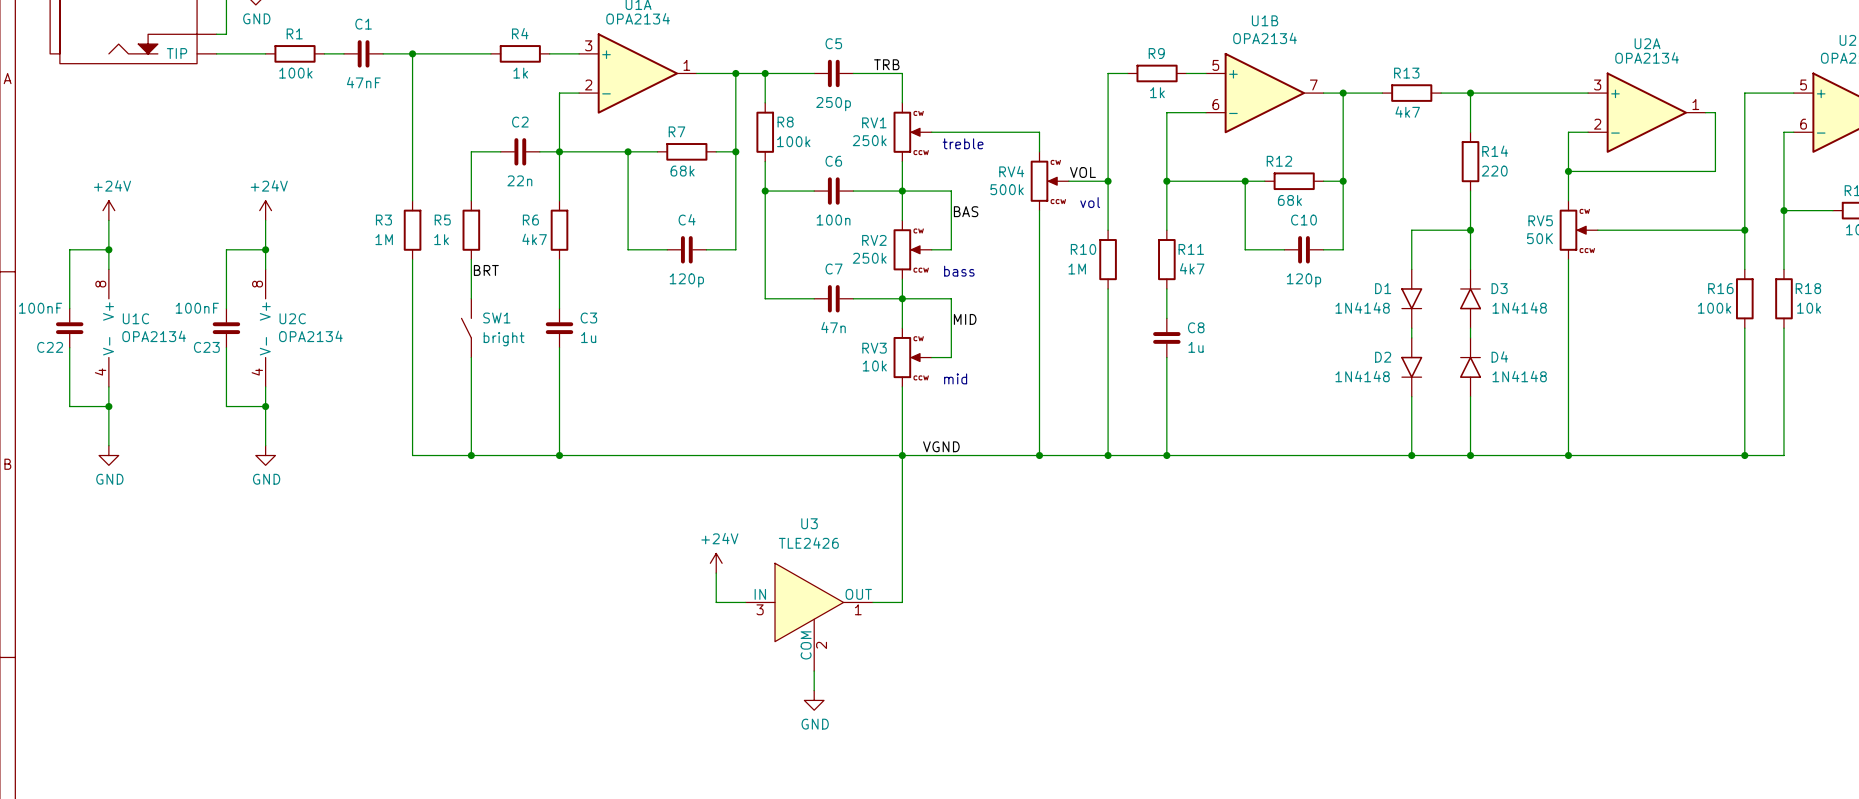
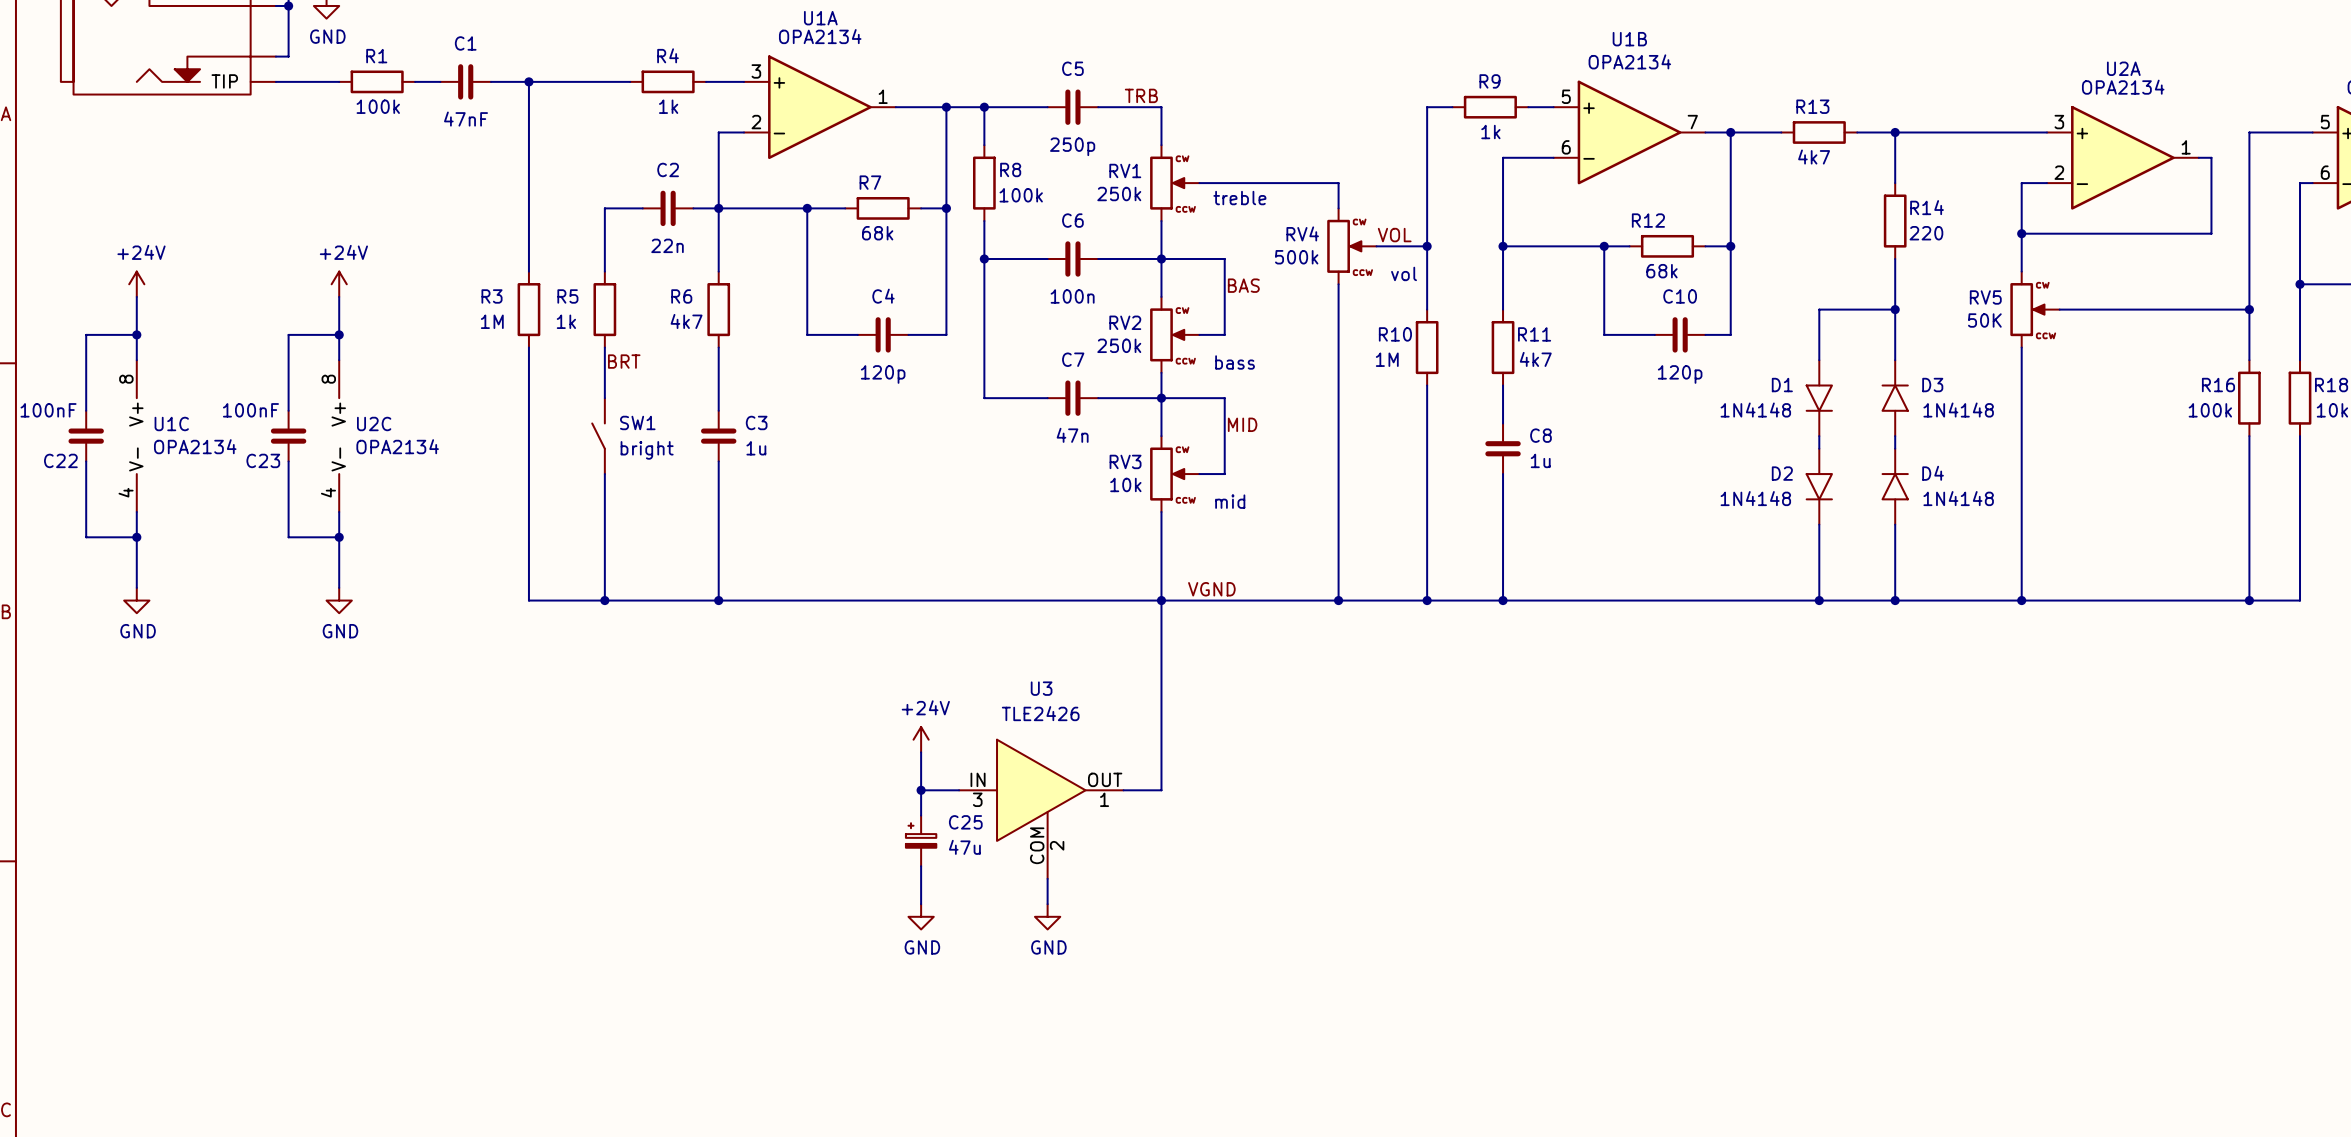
wire: none -> (921, 790) (921, 815)
junction: none -> (921, 790)
C25: none -> 47u (921, 840)
wire: none -> (921, 866) (921, 904)
power symbol: none -> GND (921, 916)

